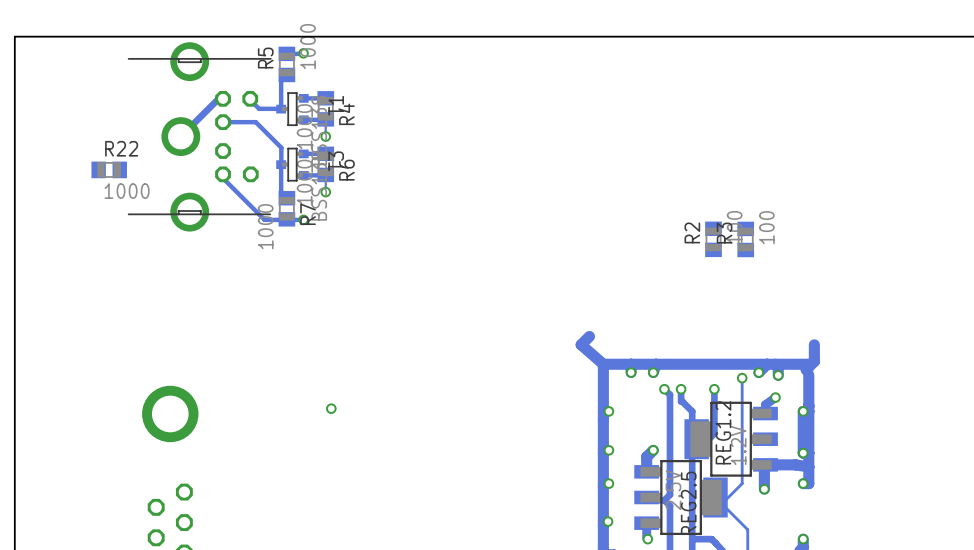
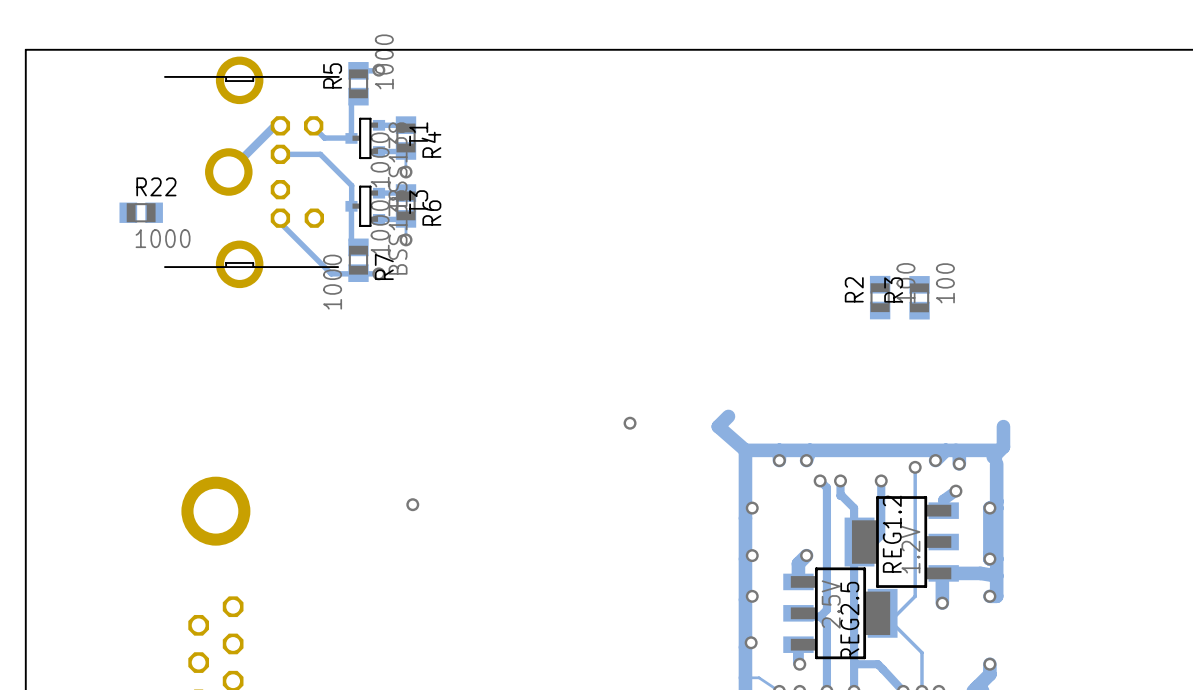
via: none -> (630, 423)

